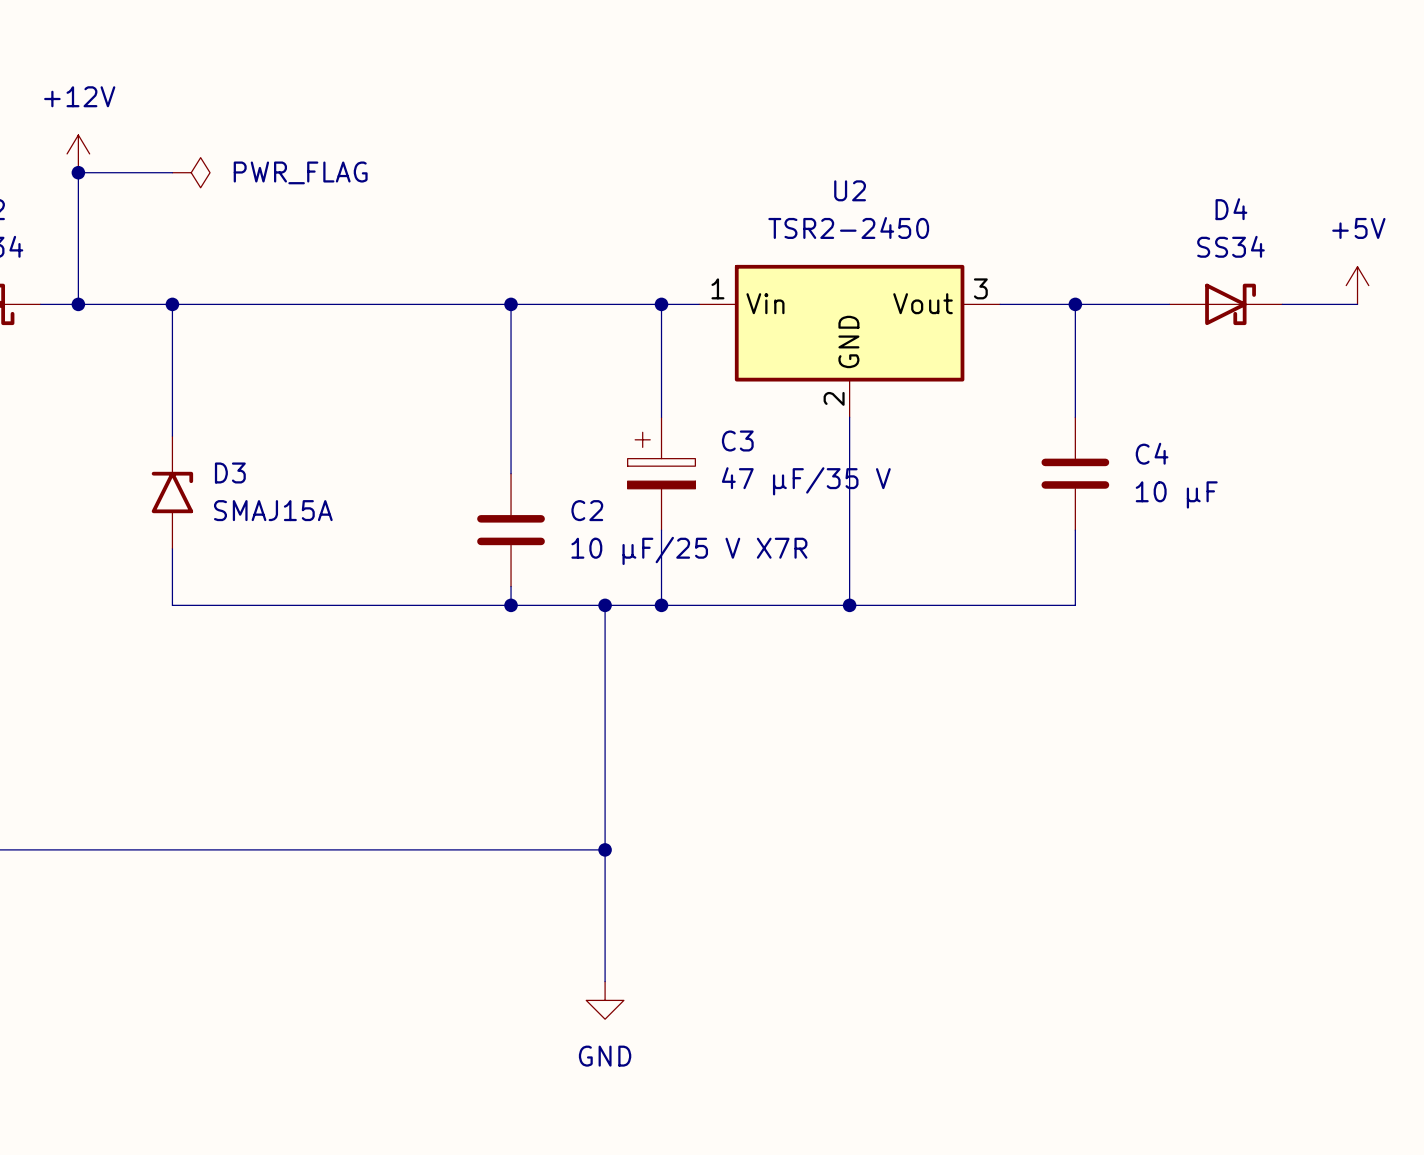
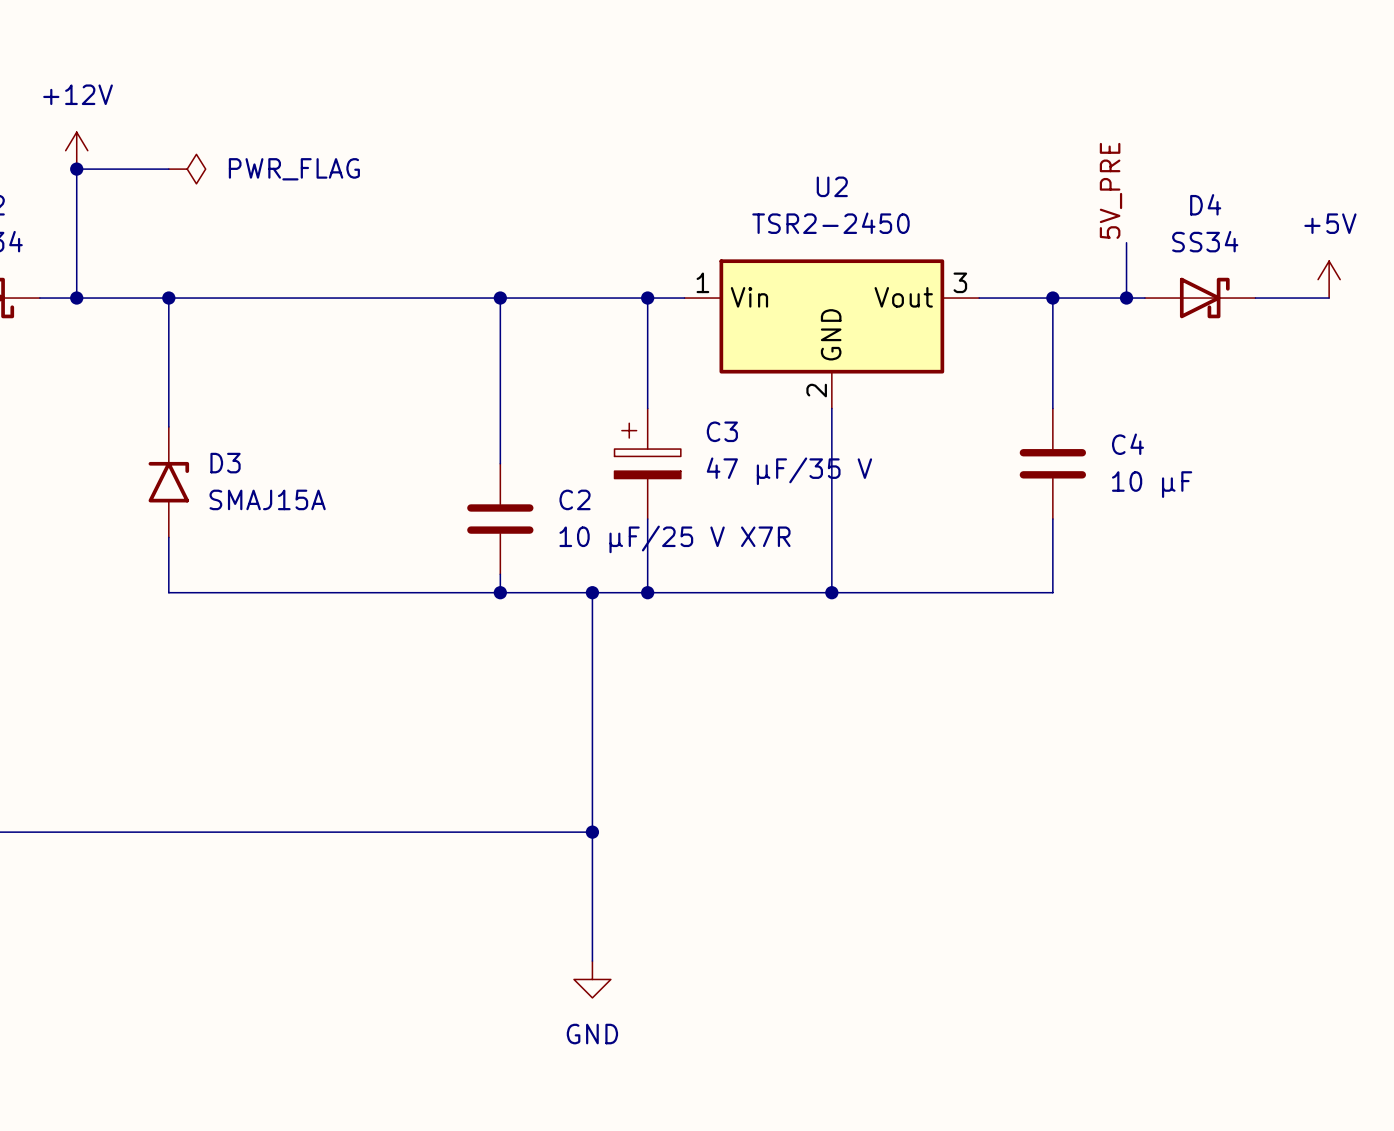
label: none -> 5V_PRE (1110, 190)
wire: none -> (1126, 242) (1126, 298)
junction: none -> (1126, 298)

